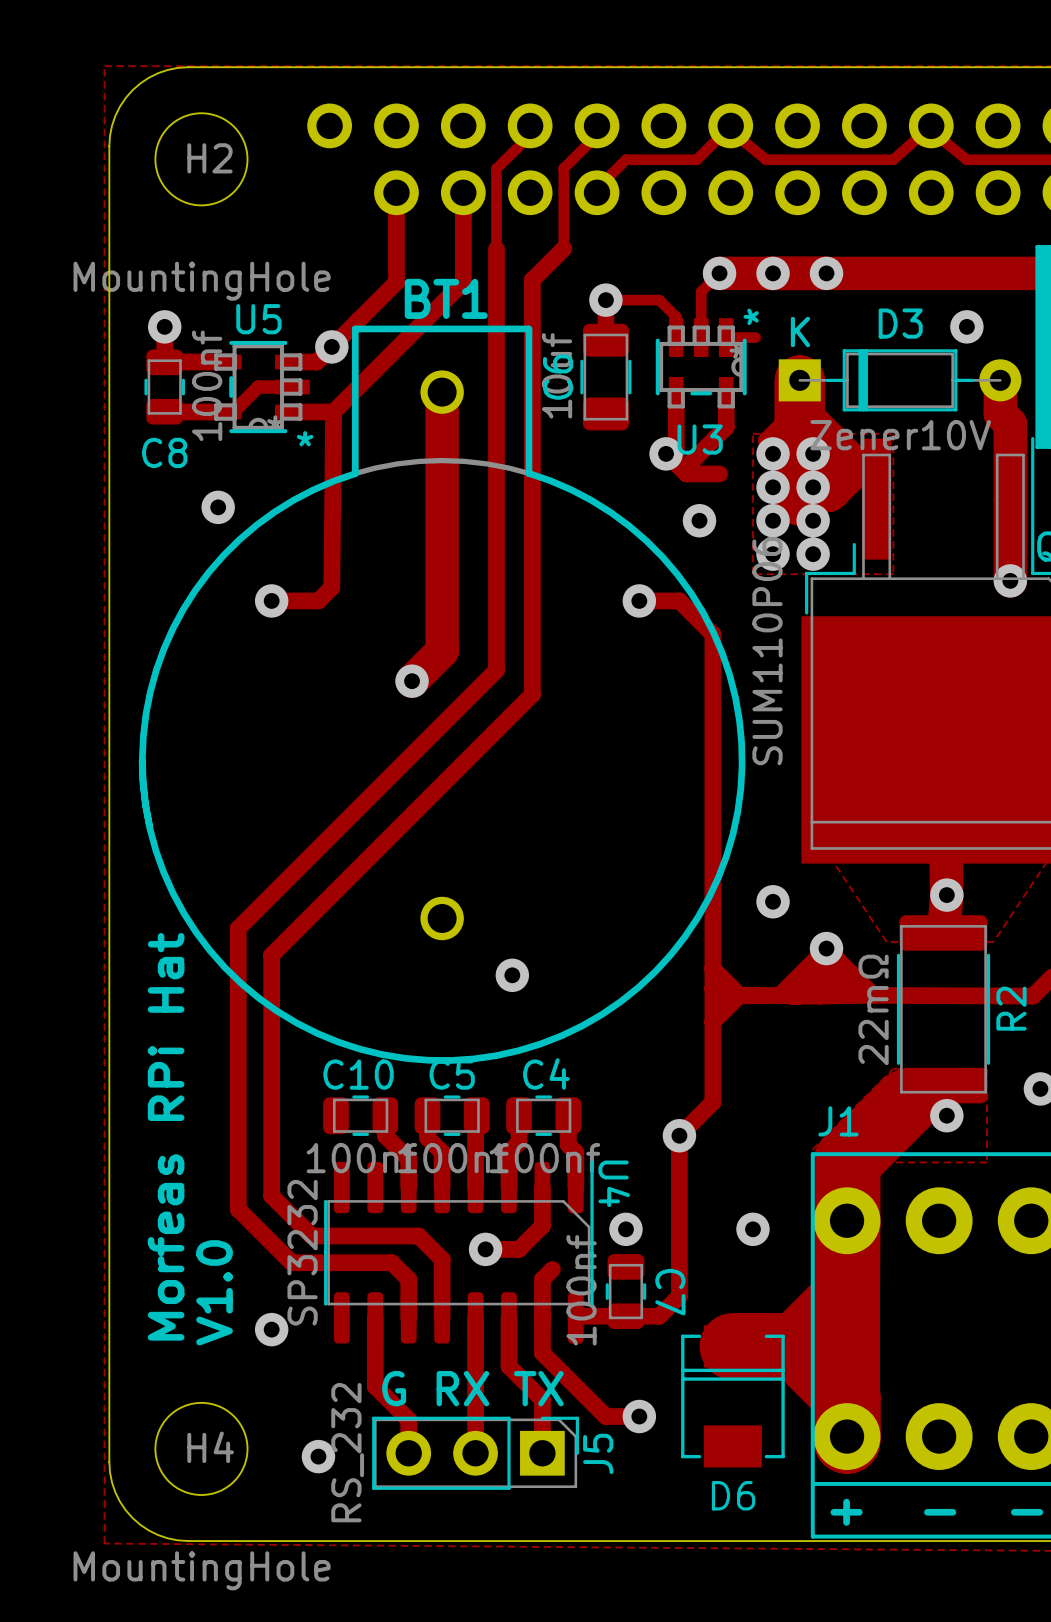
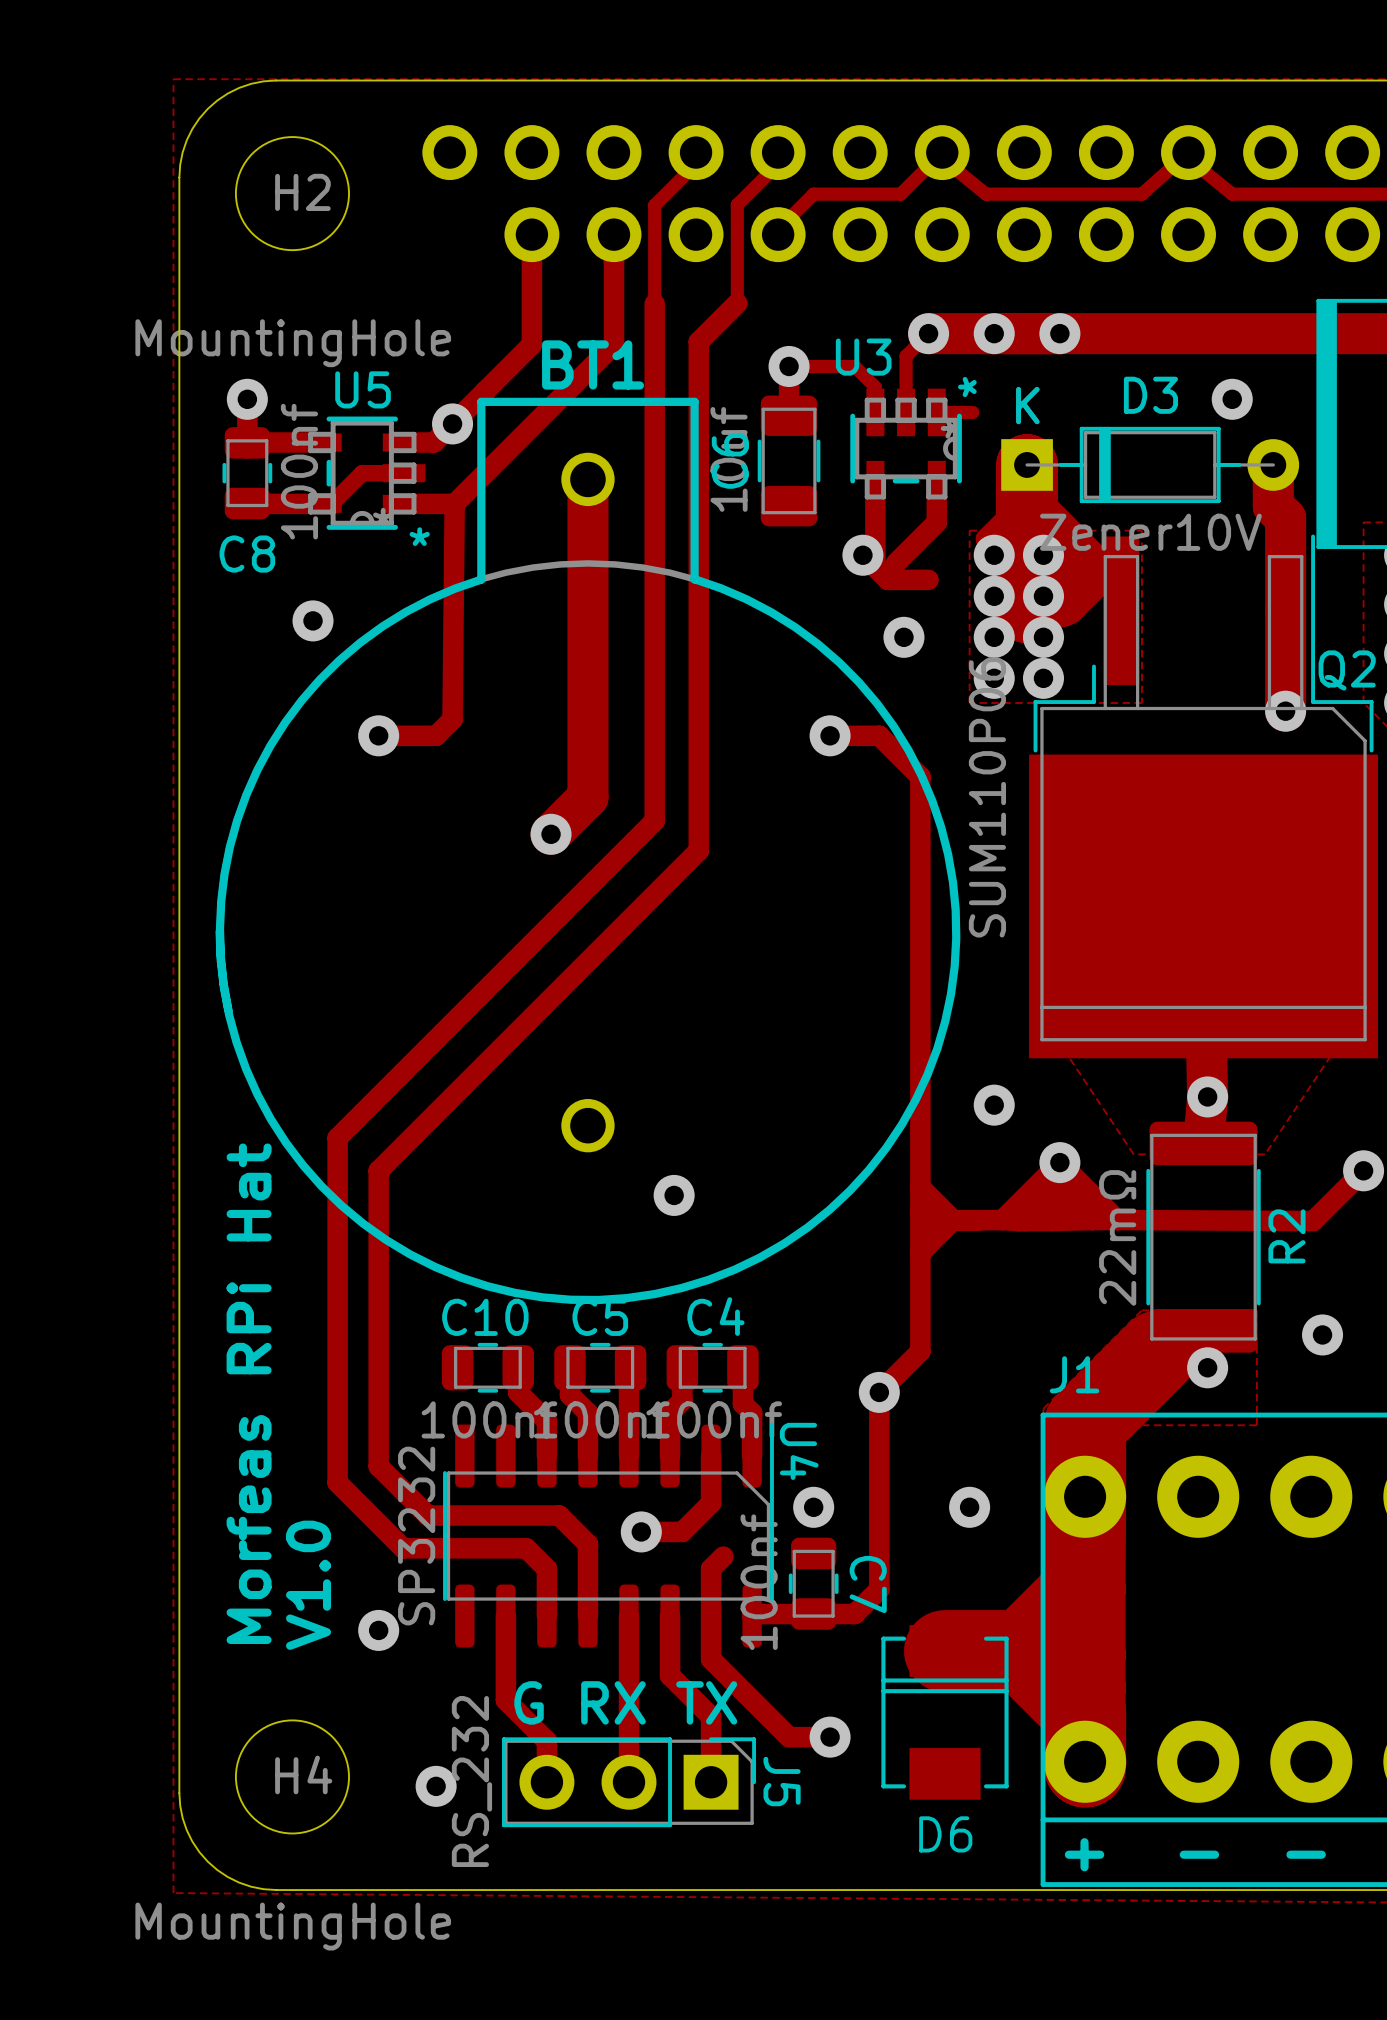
U3 name position: U3 (700, 439) -> U3 (863, 357)
J5 name rotation: 0° (598, 1453) -> 180° (782, 1781)

